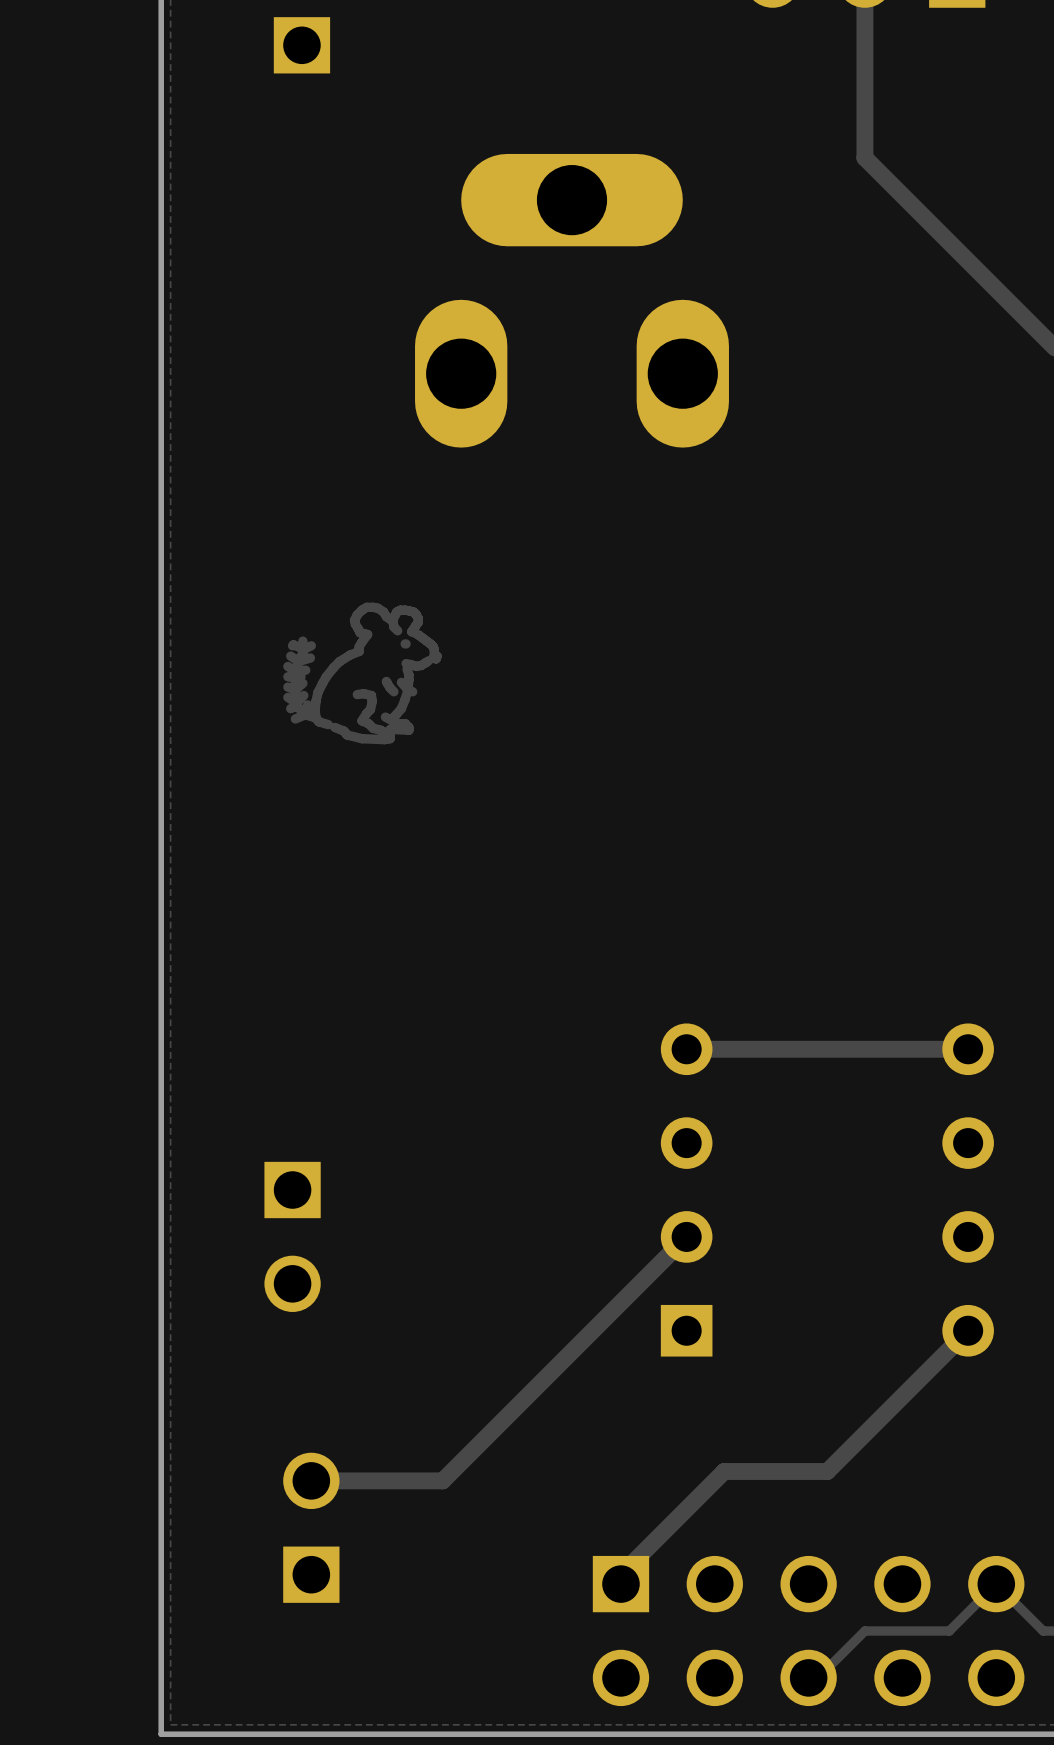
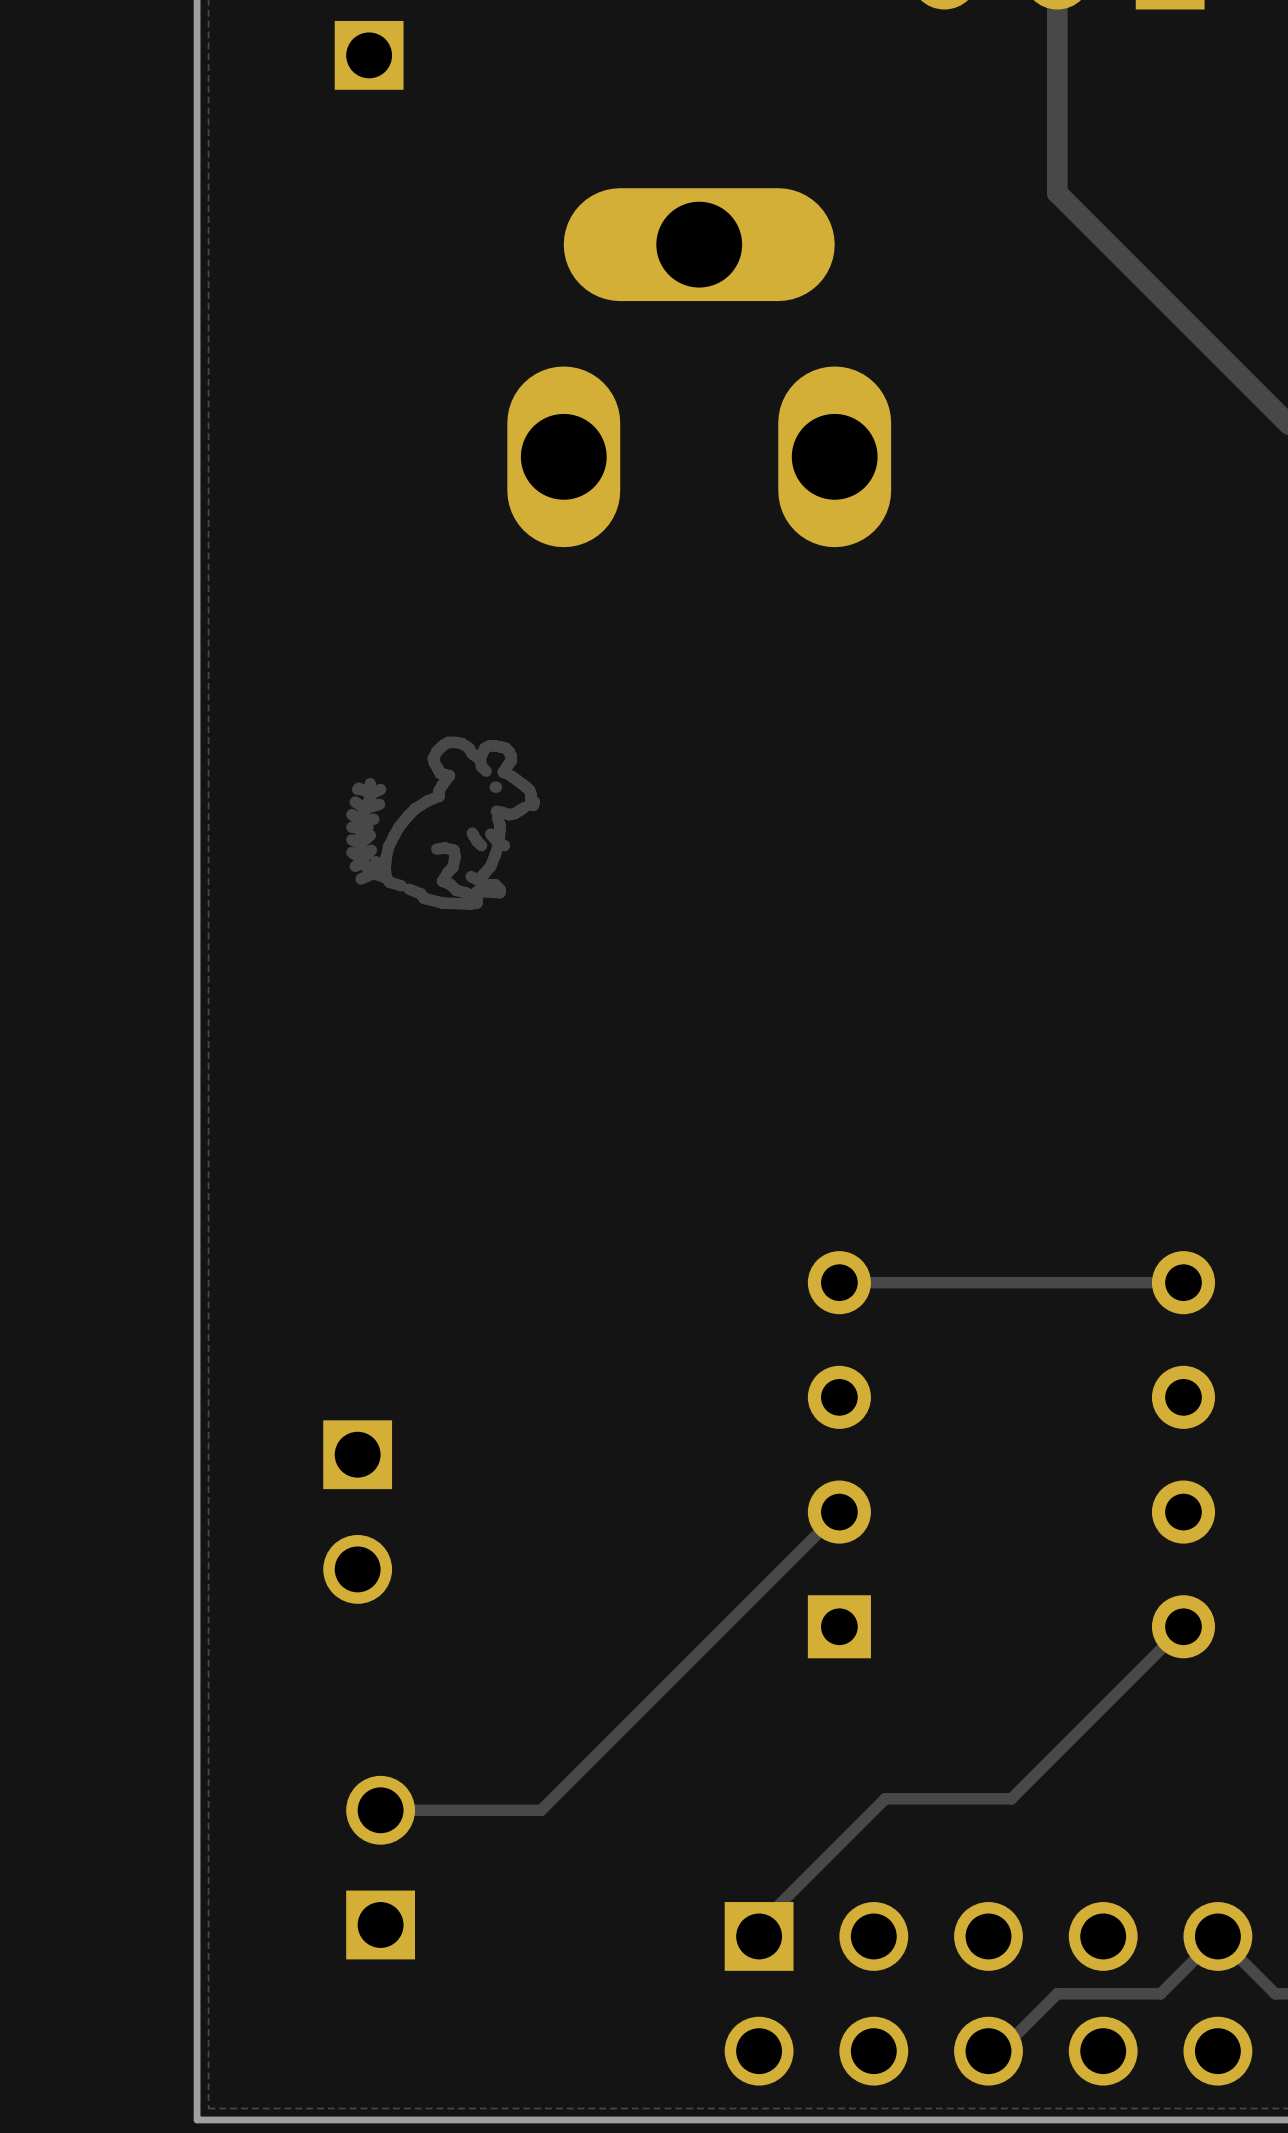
track width: thick (968, 1049) (686, 1049) -> thin (1183, 1282) (839, 1282)
track width: thick (686, 1236) (442, 1480) (311, 1480) -> thin (839, 1512) (541, 1810) (380, 1810)
track width: thick (968, 1330) (827, 1471) (724, 1471) (620, 1574) (620, 1584) -> thin (1183, 1626) (1011, 1798) (885, 1798) (759, 1924) (759, 1936)

